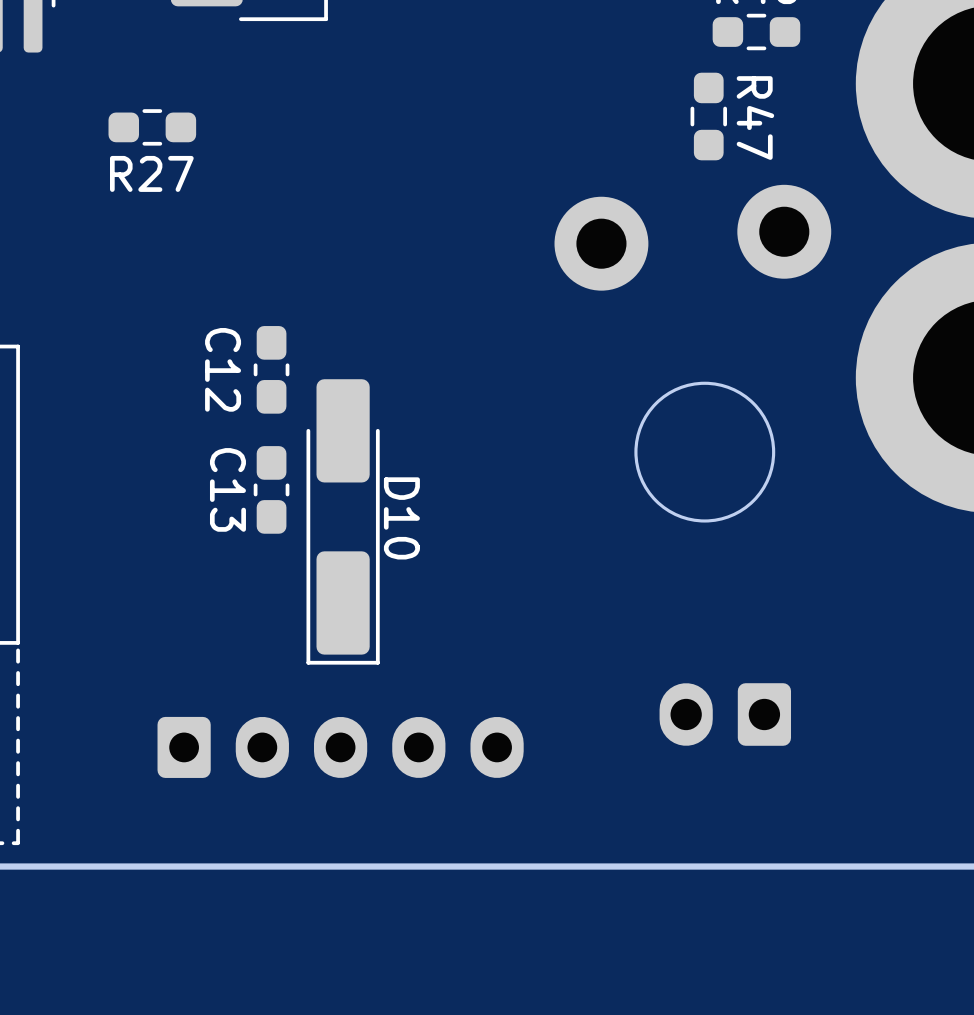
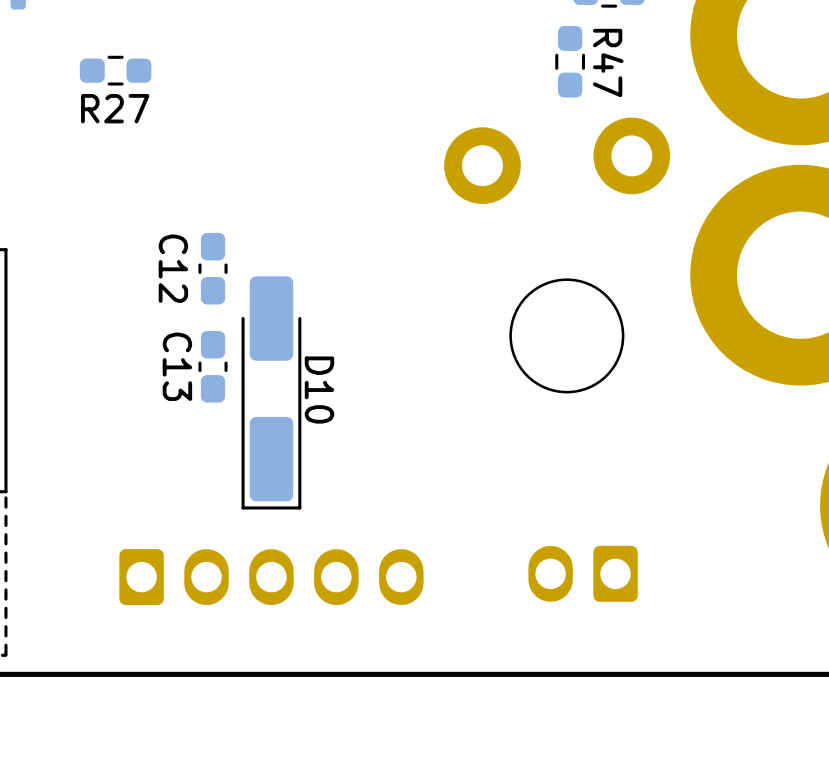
part footprint: [659, 683, 792, 746] -> [528, 545, 638, 602]
part footprint: [157, 716, 524, 778] -> [119, 549, 424, 606]

